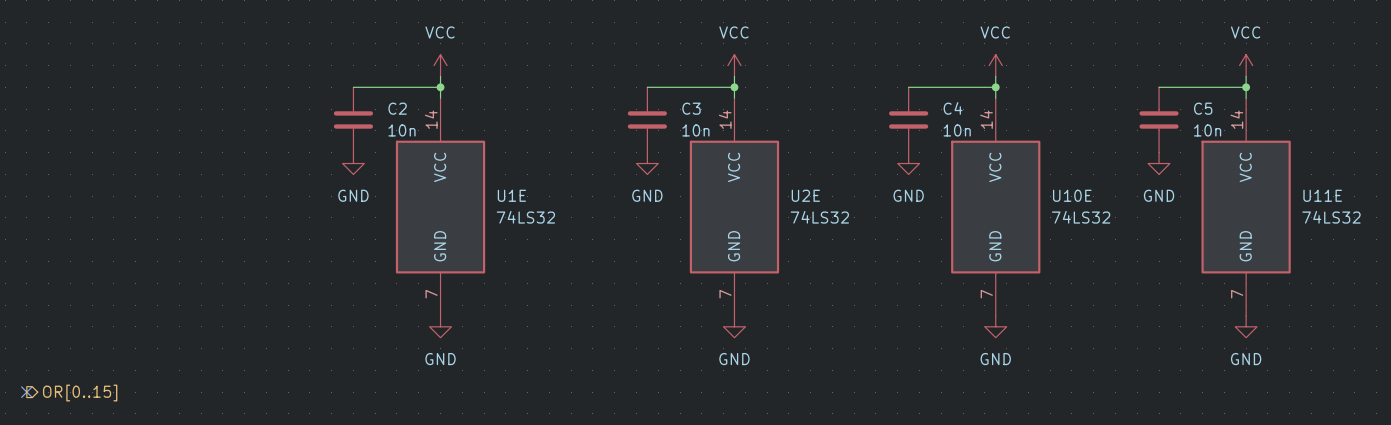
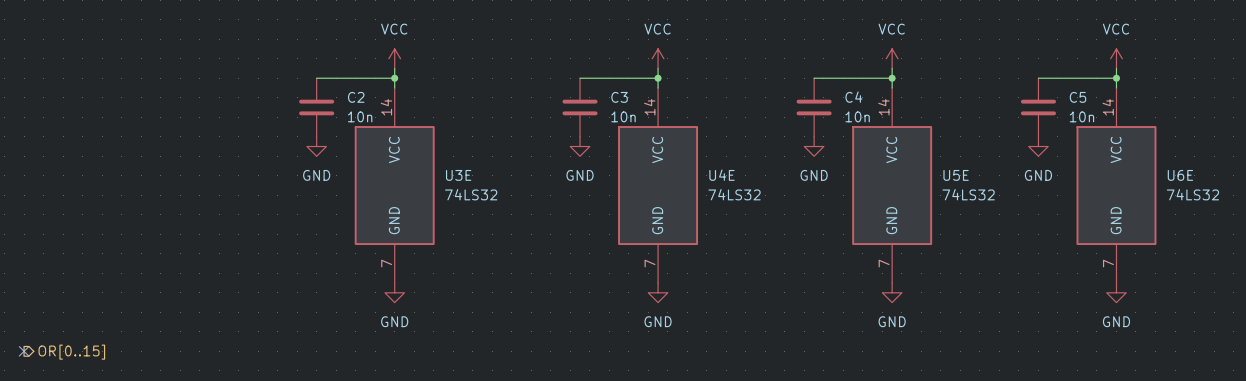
U1E name: U1E (511, 195) -> U3E (458, 175)
U2E name: U2E (805, 195) -> U4E (721, 175)
U10E name: U10E (1072, 195) -> U5E (956, 175)
U11E name: U11E (1322, 195) -> U6E (1180, 175)

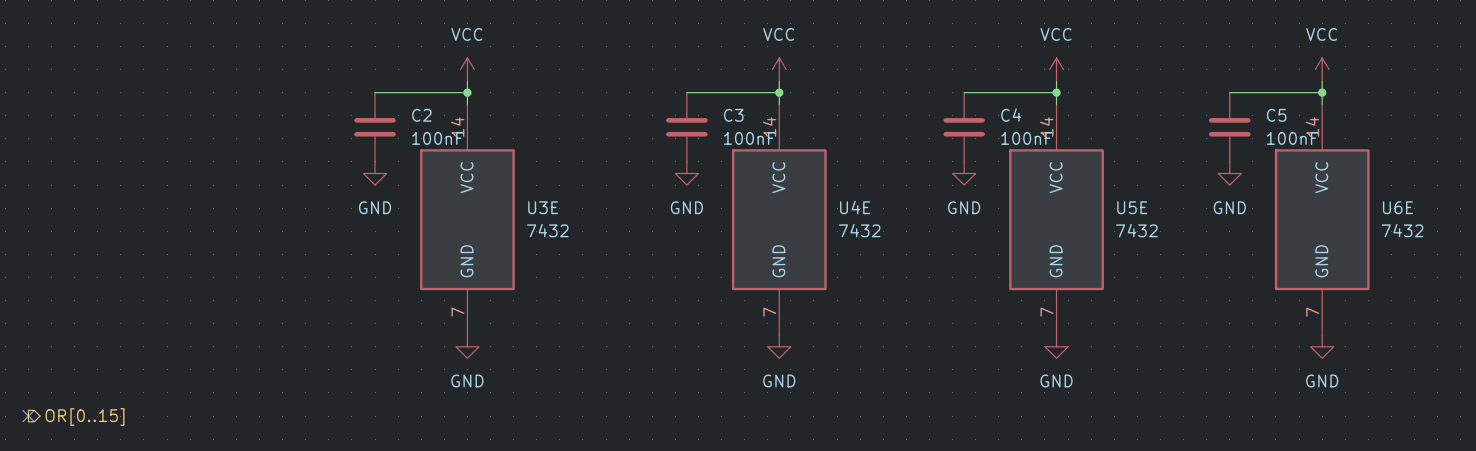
C2 value: 10n (360, 116) -> 100nF (437, 138)
C3 value: 10n (623, 116) -> 100nF (749, 138)
C4 value: 10n (857, 116) -> 100nF (1026, 138)
C5 value: 10n (1081, 116) -> 100nF (1292, 138)
U3E value: 74LS32 (471, 194) -> 7432 (547, 230)
U4E value: 74LS32 (734, 194) -> 7432 (859, 230)
U5E value: 74LS32 (968, 194) -> 7432 (1136, 230)
U6E value: 74LS32 (1192, 194) -> 7432 (1402, 230)

